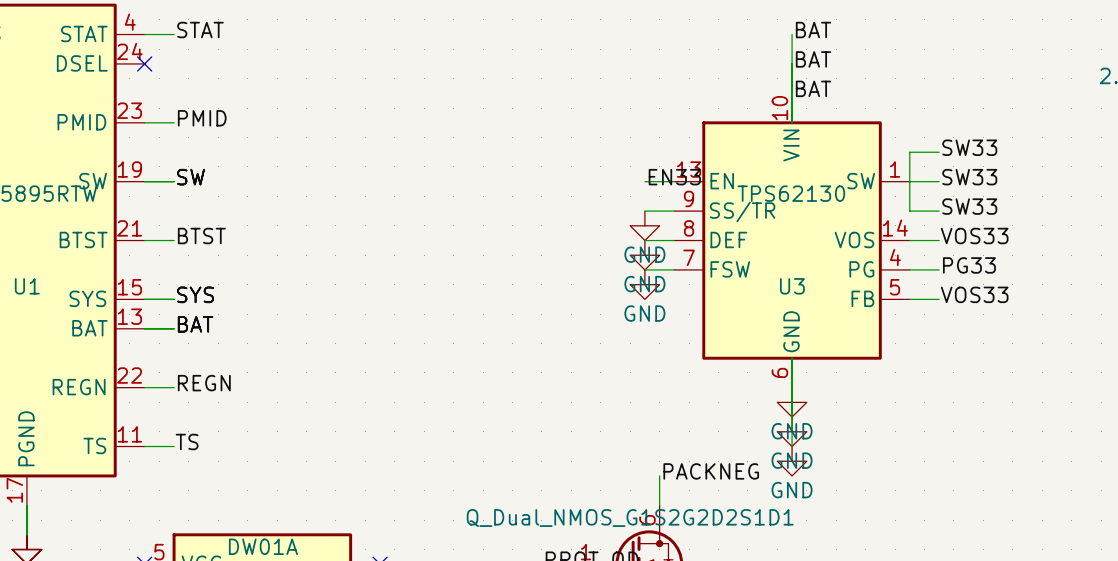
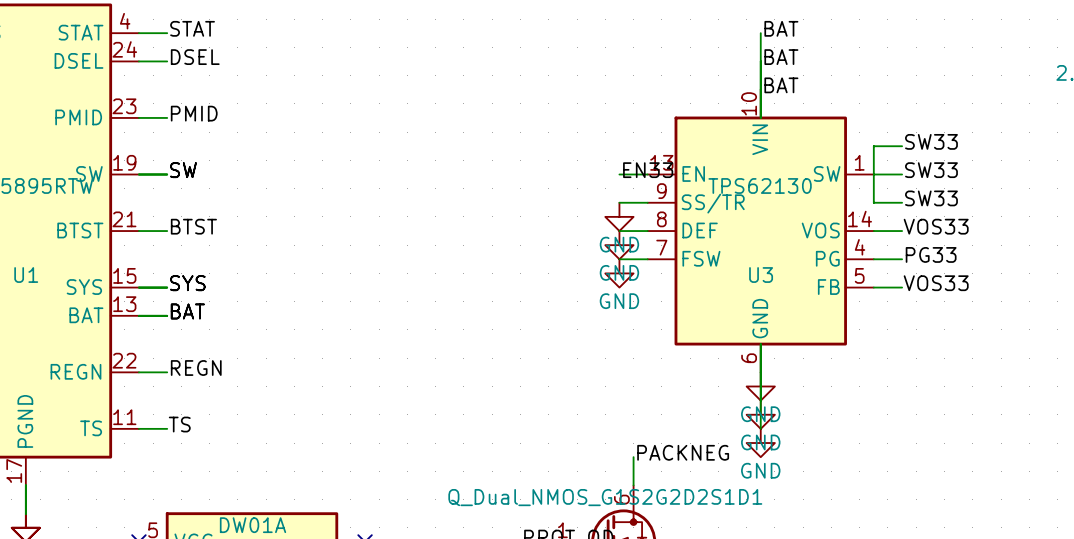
label: none -> DSEL (195, 57)
wire: none -> (138, 61) (167, 61)
no-connect mark: (144, 63) -> none

